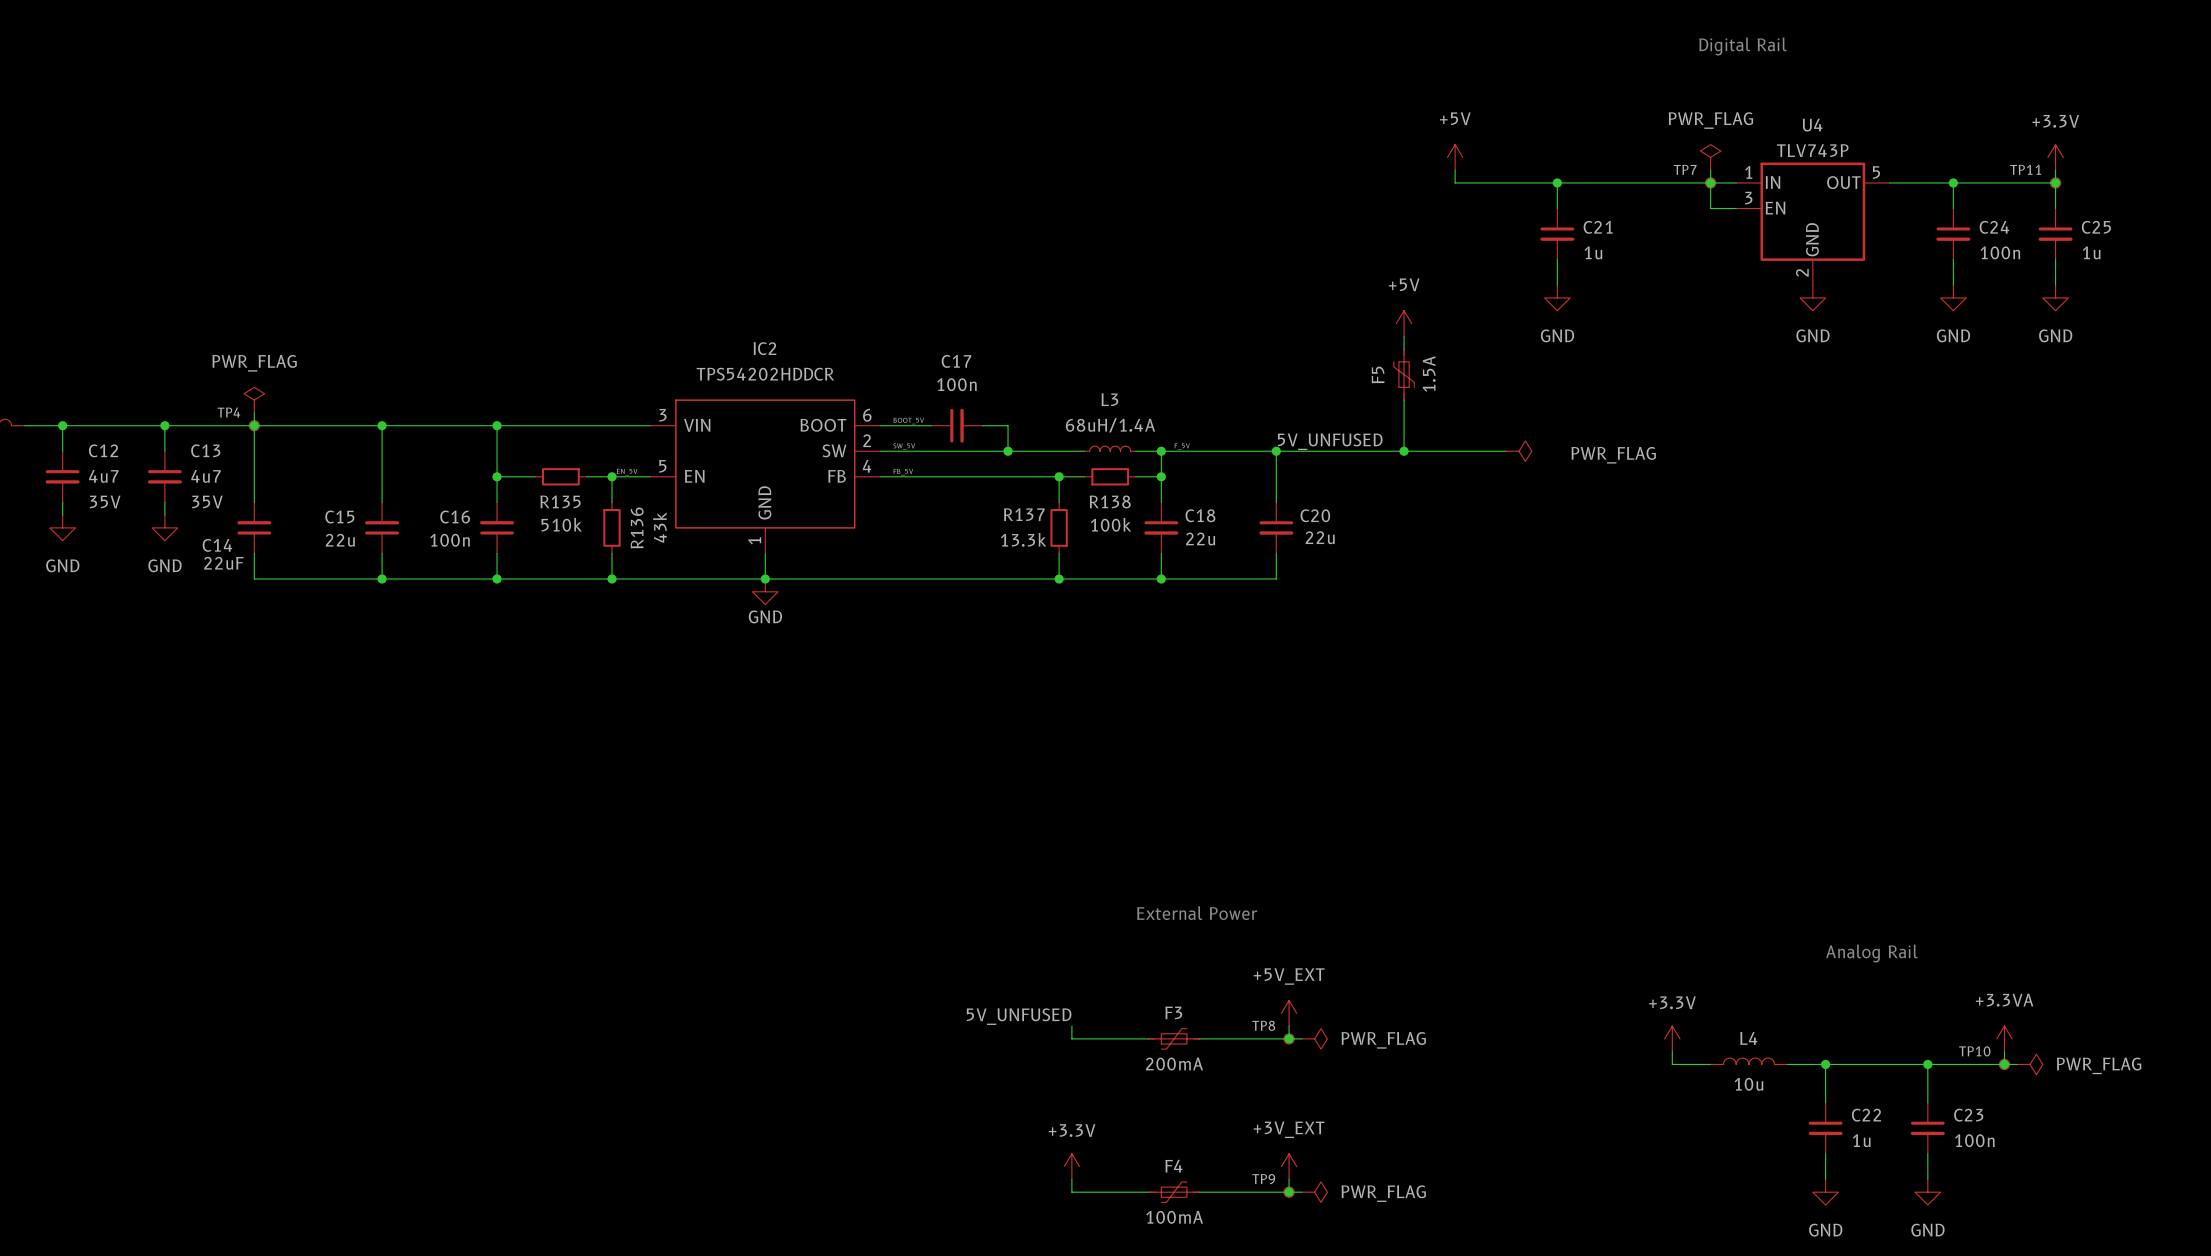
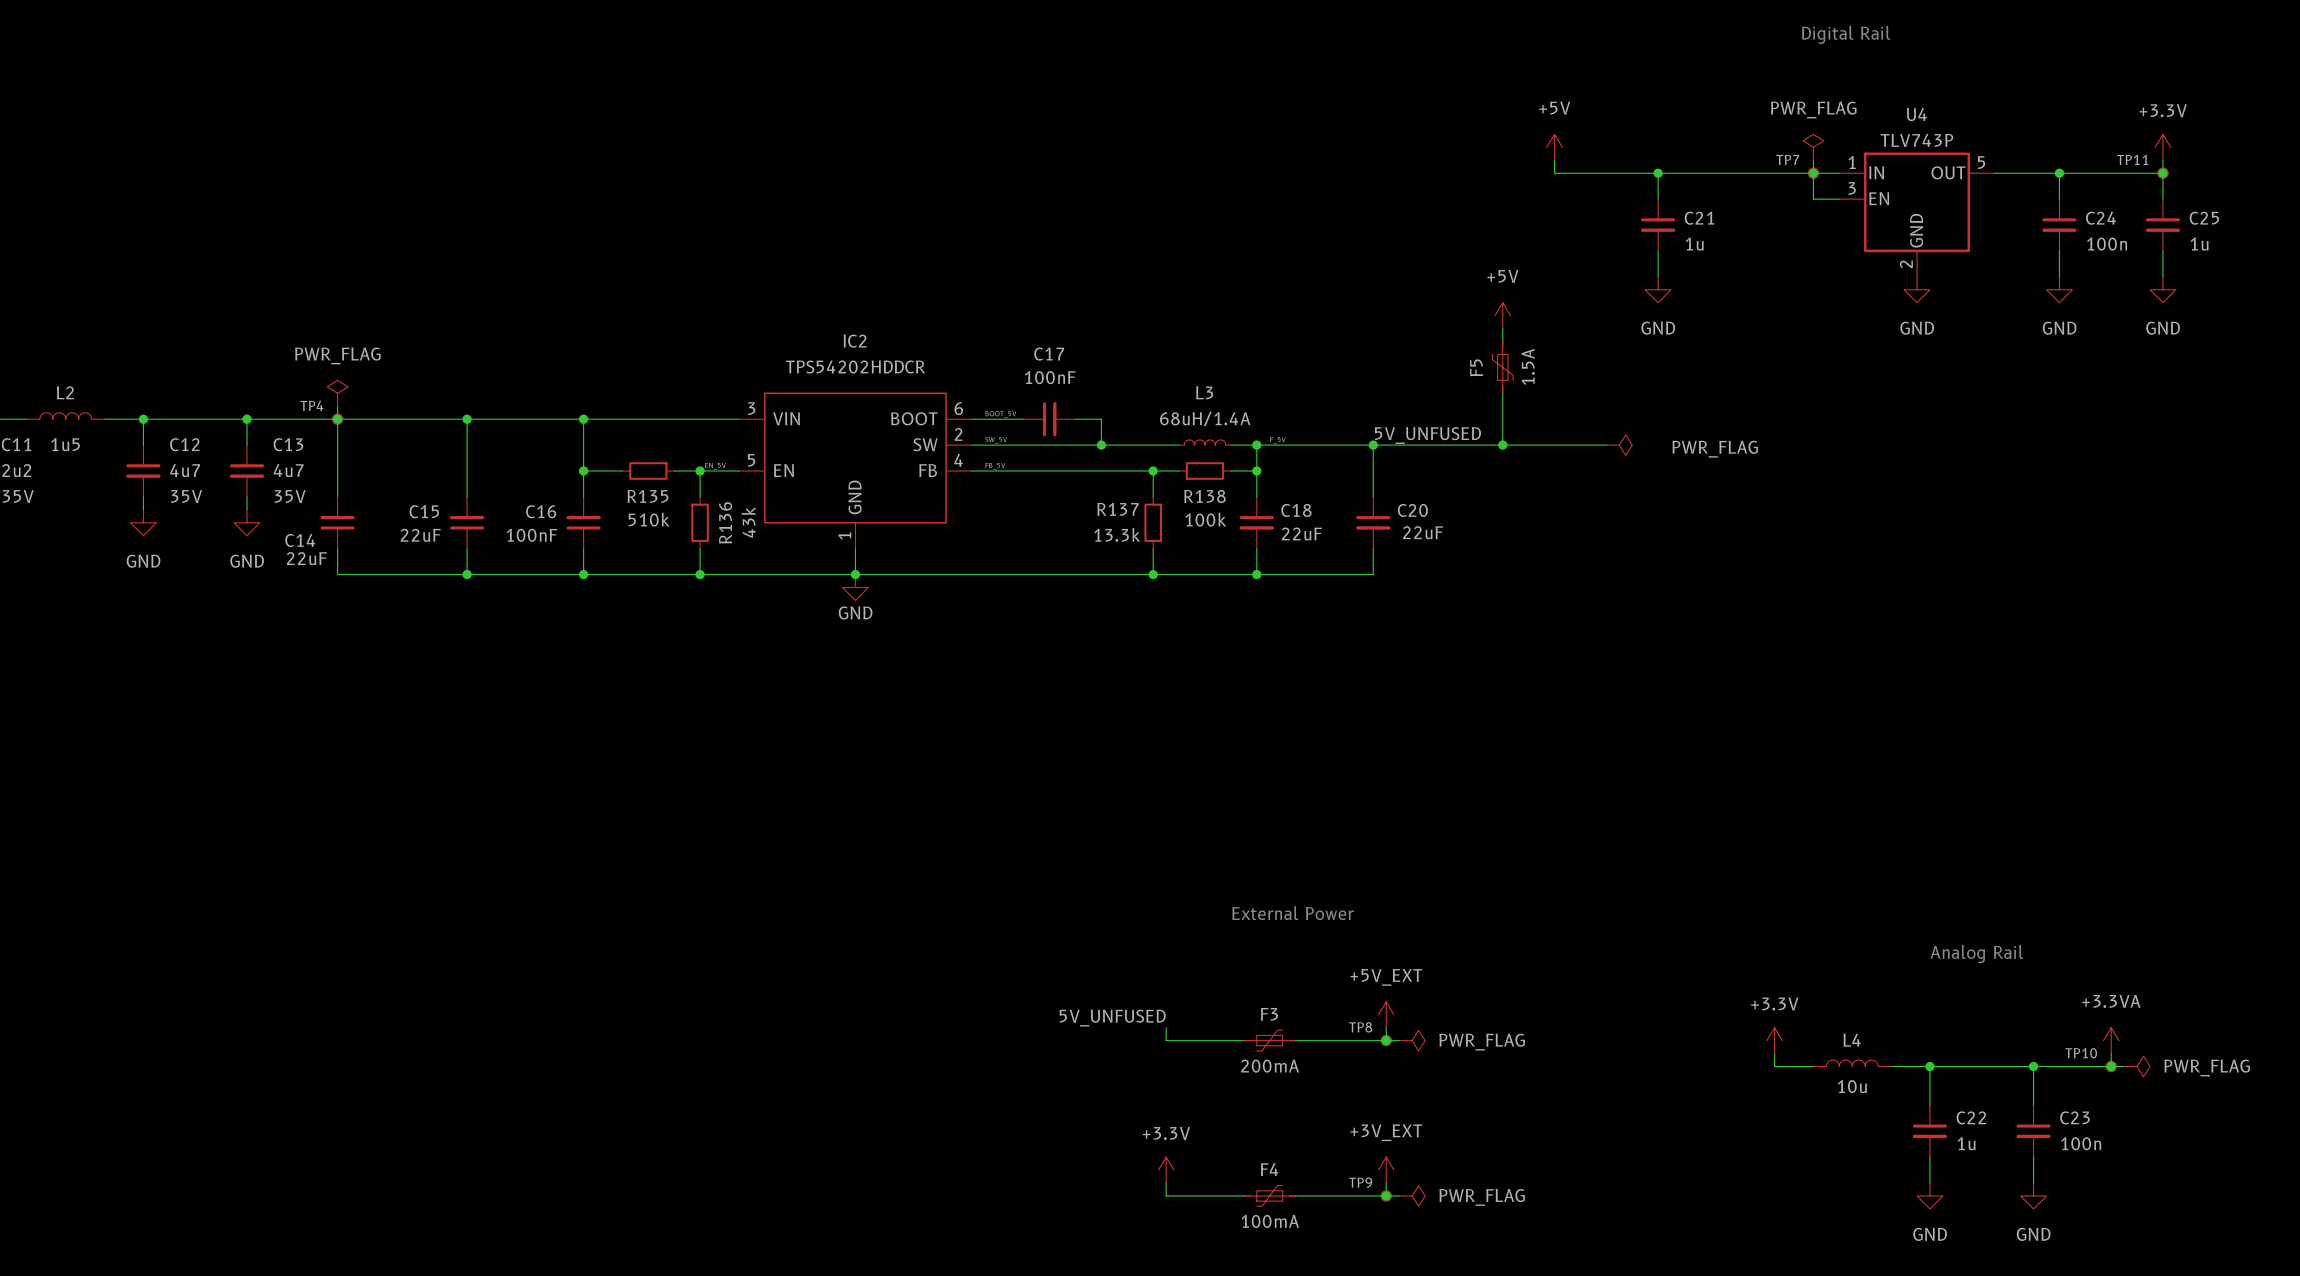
C17 value: 100n (956, 384) -> 100nF (1050, 377)
C20 value: 22u (1320, 537) -> 22uF (1423, 532)
C18 value: 22u (1200, 539) -> 22uF (1301, 534)
C15 value: 22u (340, 540) -> 22uF (420, 535)
C16 value: 100n (450, 540) -> 100nF (531, 535)

